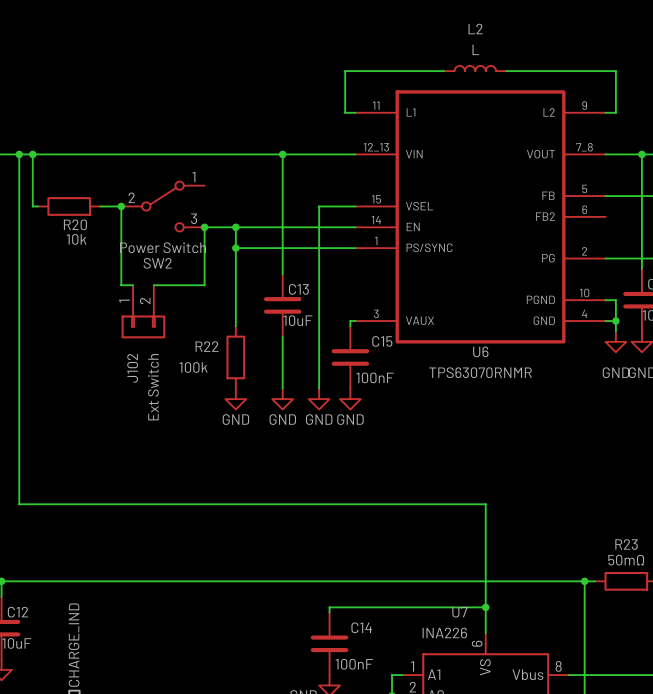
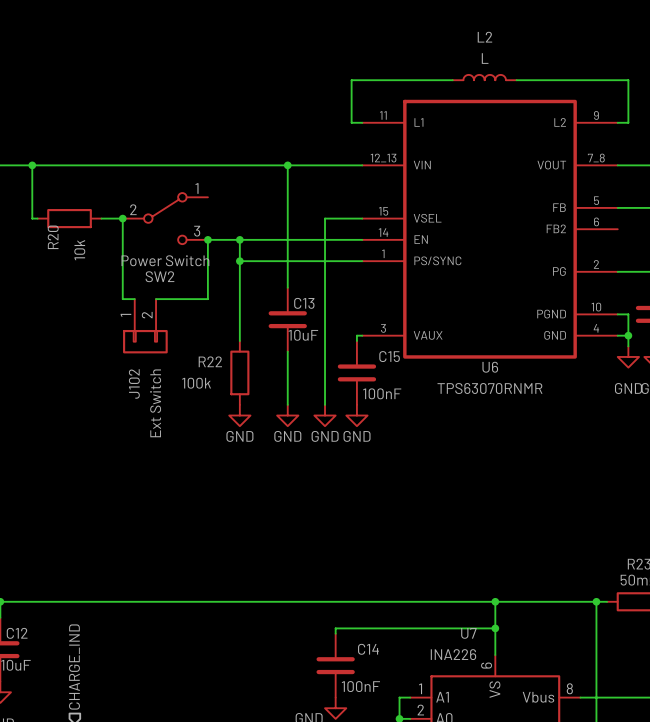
wire: (19, 154) (19, 504) (485, 504) (485, 581) -> none
junction: (19, 154) -> none
R20 name rotation: 0° (75, 224) -> 90° counterclockwise (53, 237)
R20 value rotation: 0° (76, 239) -> 90° counterclockwise (79, 250)
junction: none -> (495, 601)

